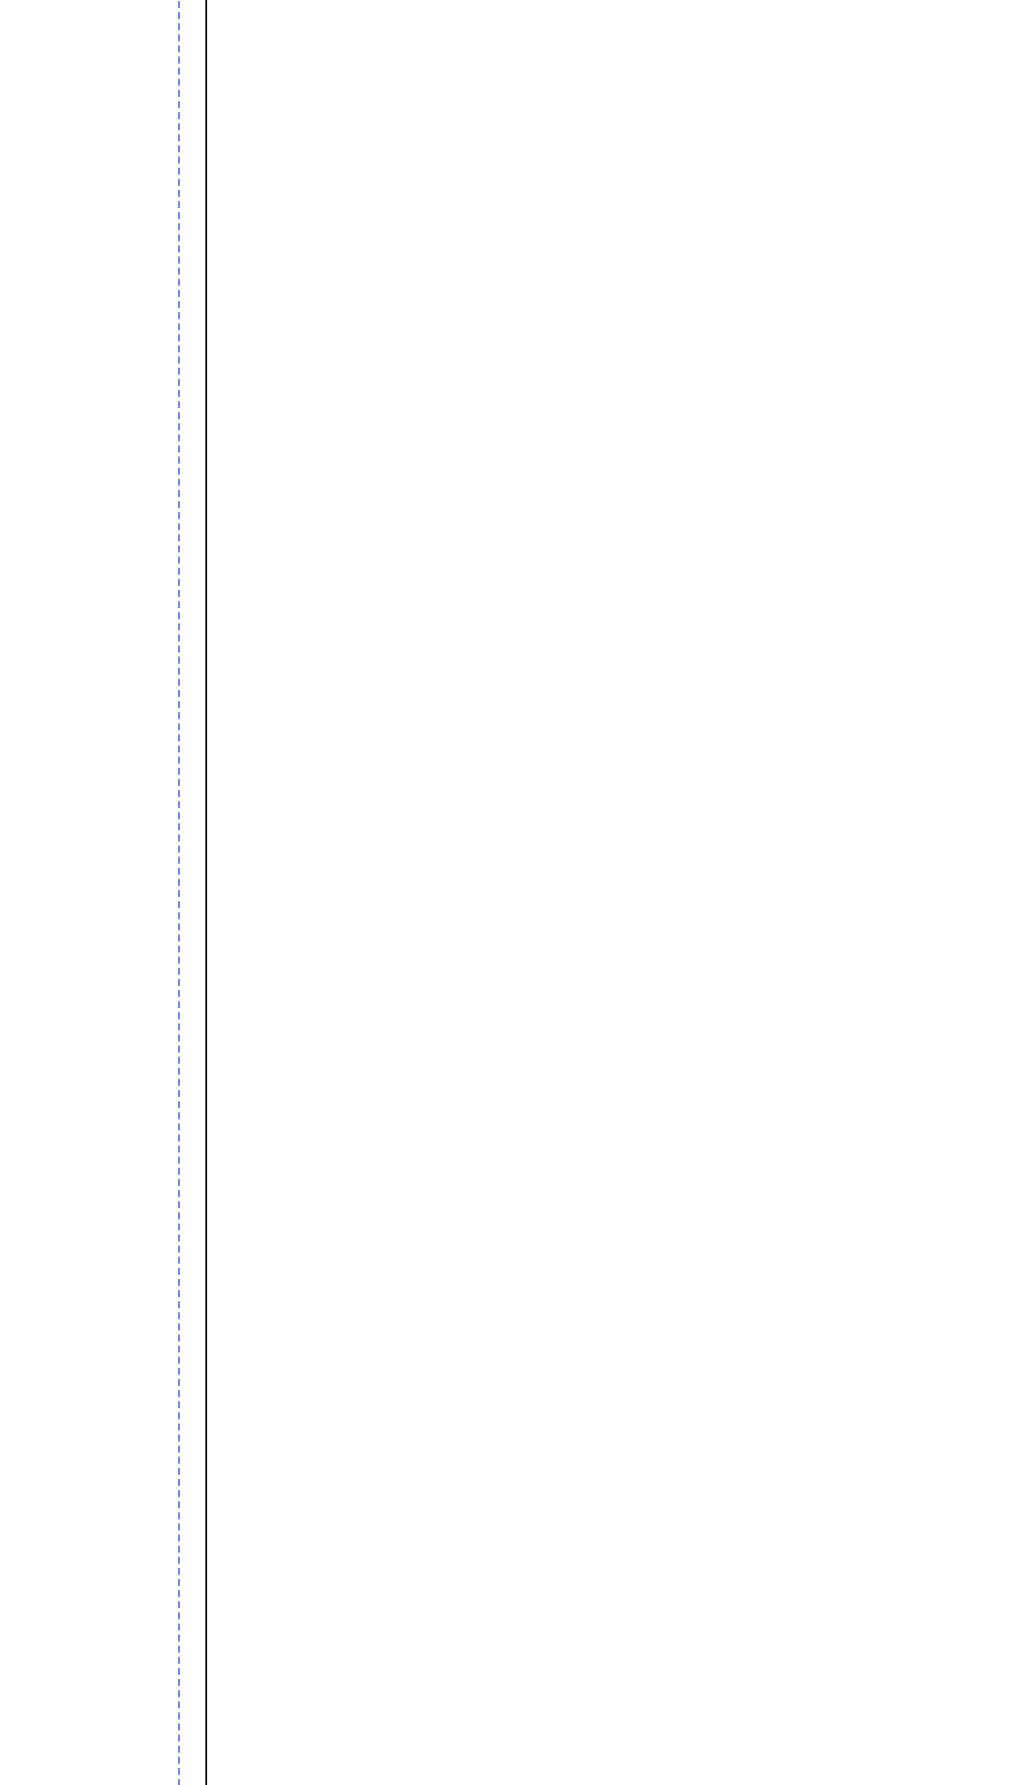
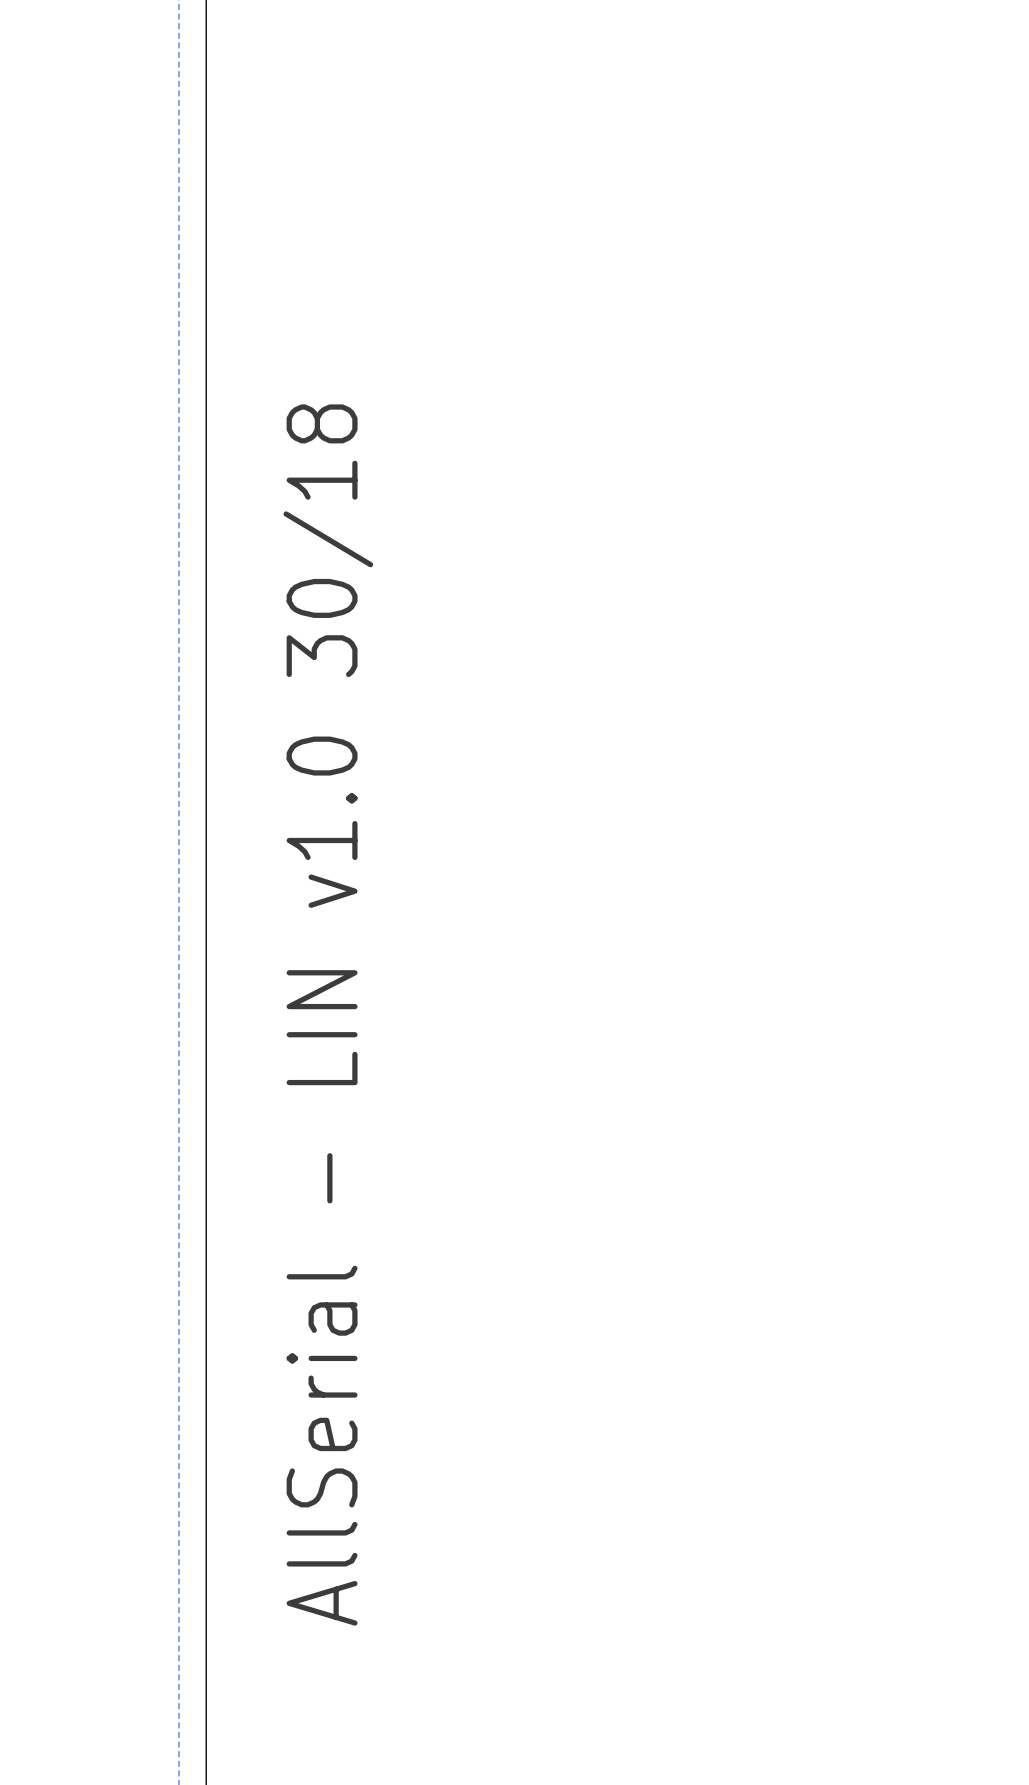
text: none -> AllSerial - LIN v1.0 30/18 (328, 1015)

